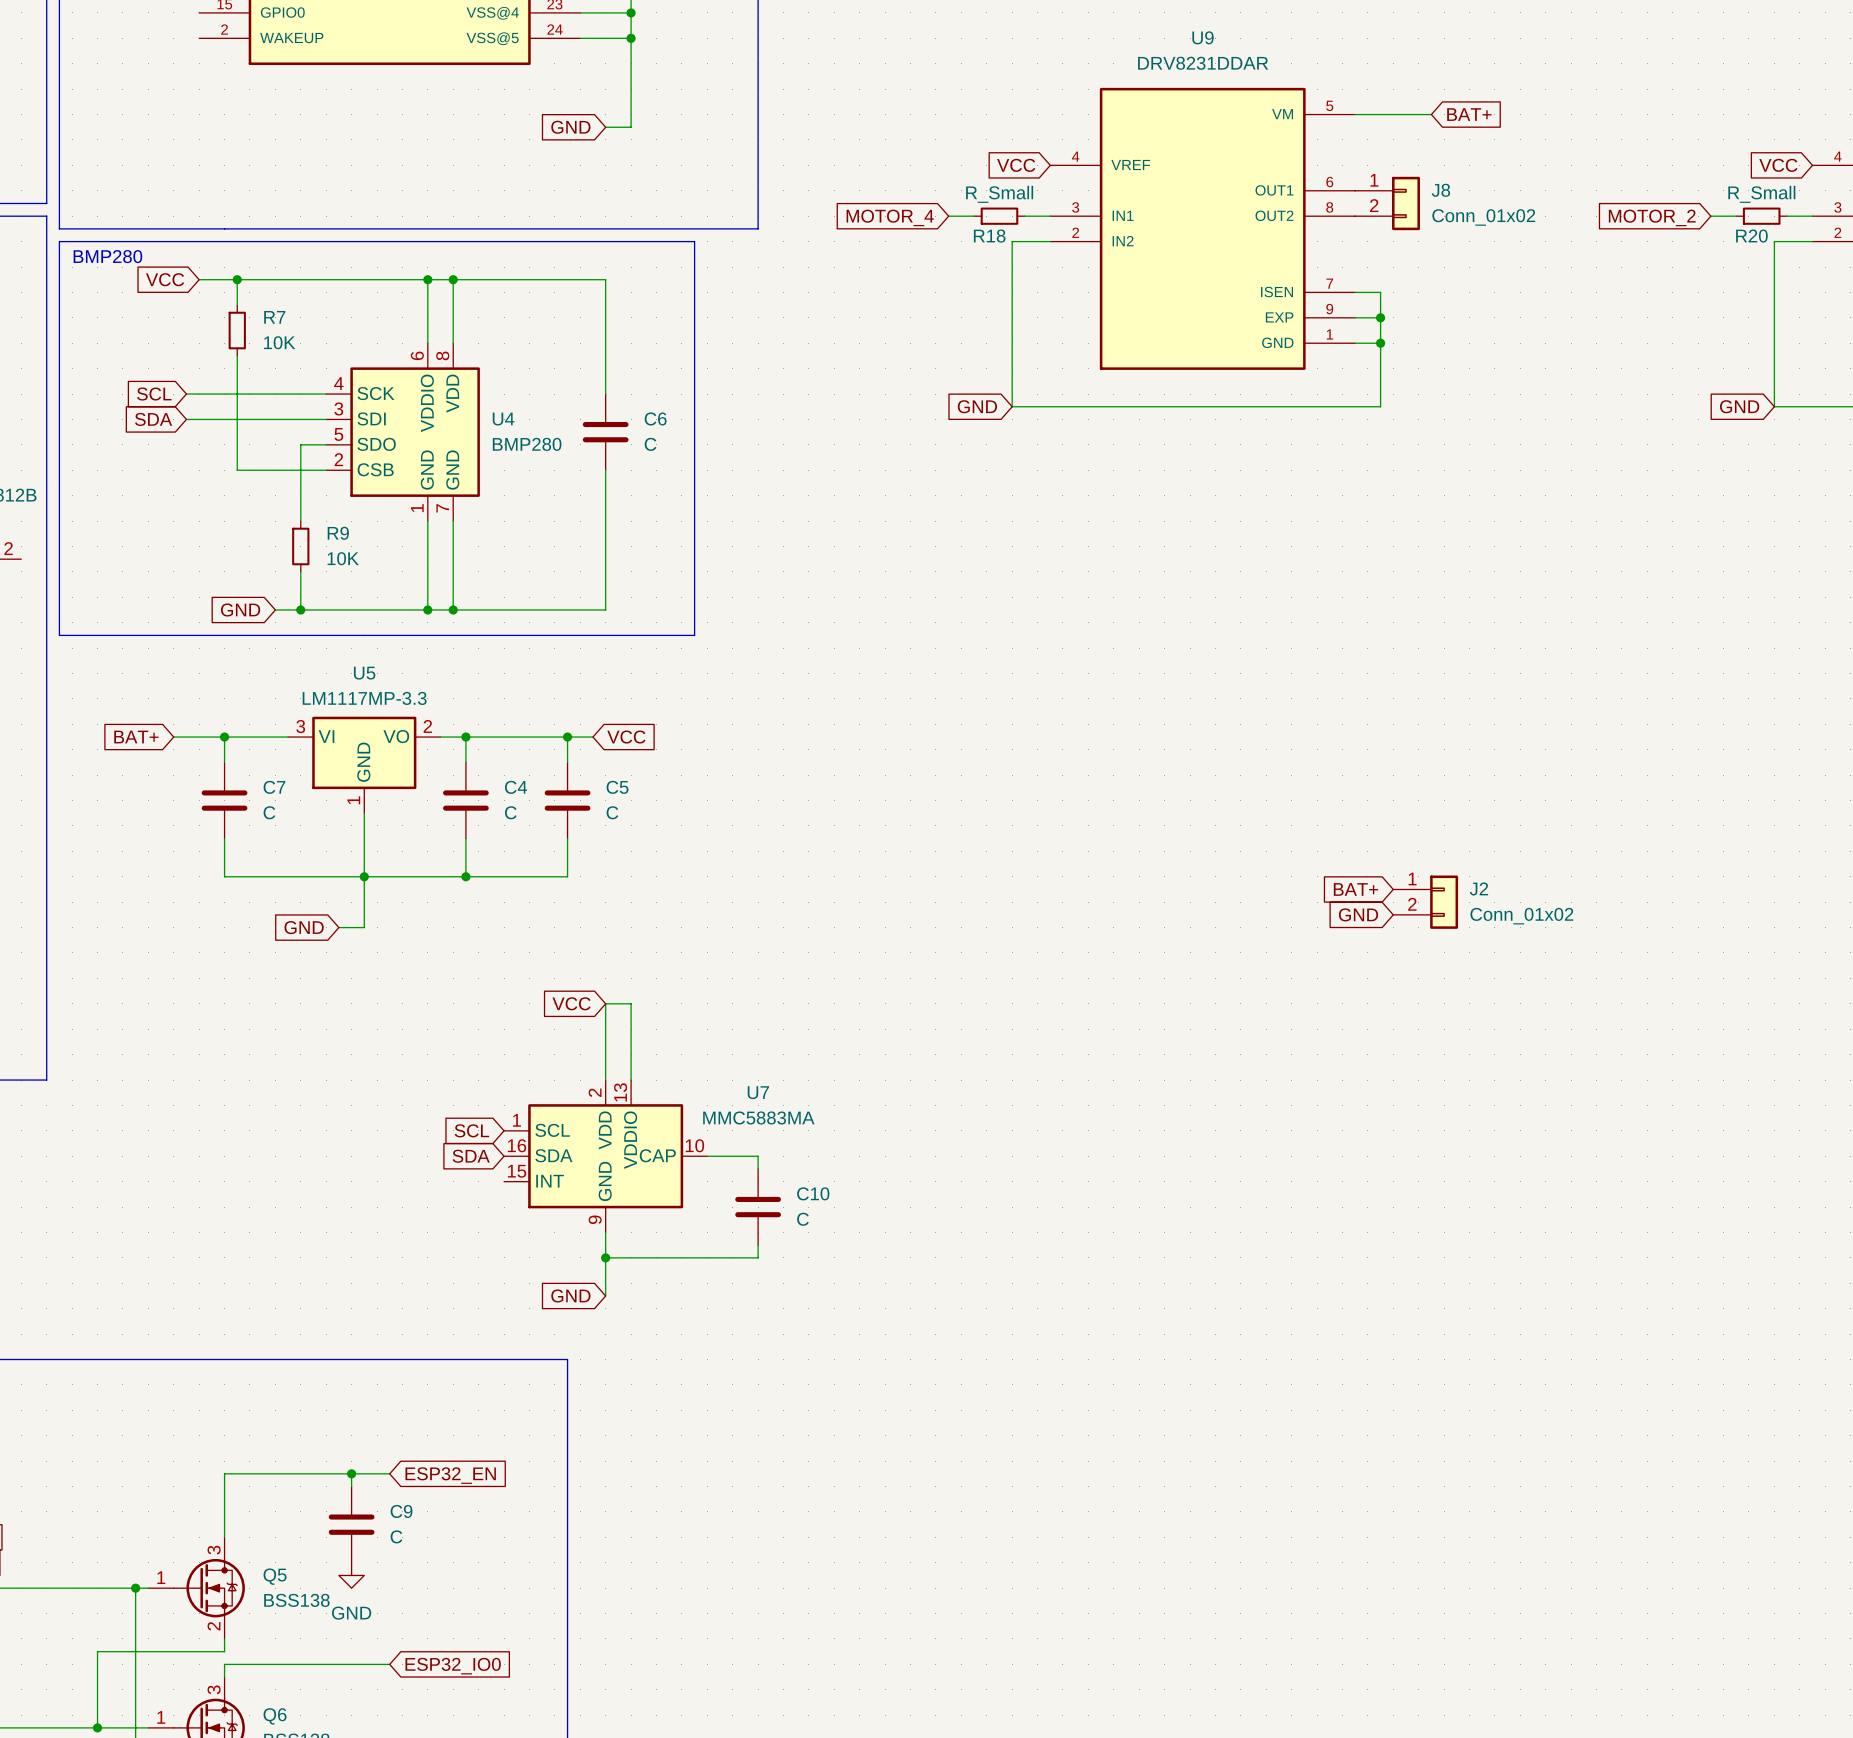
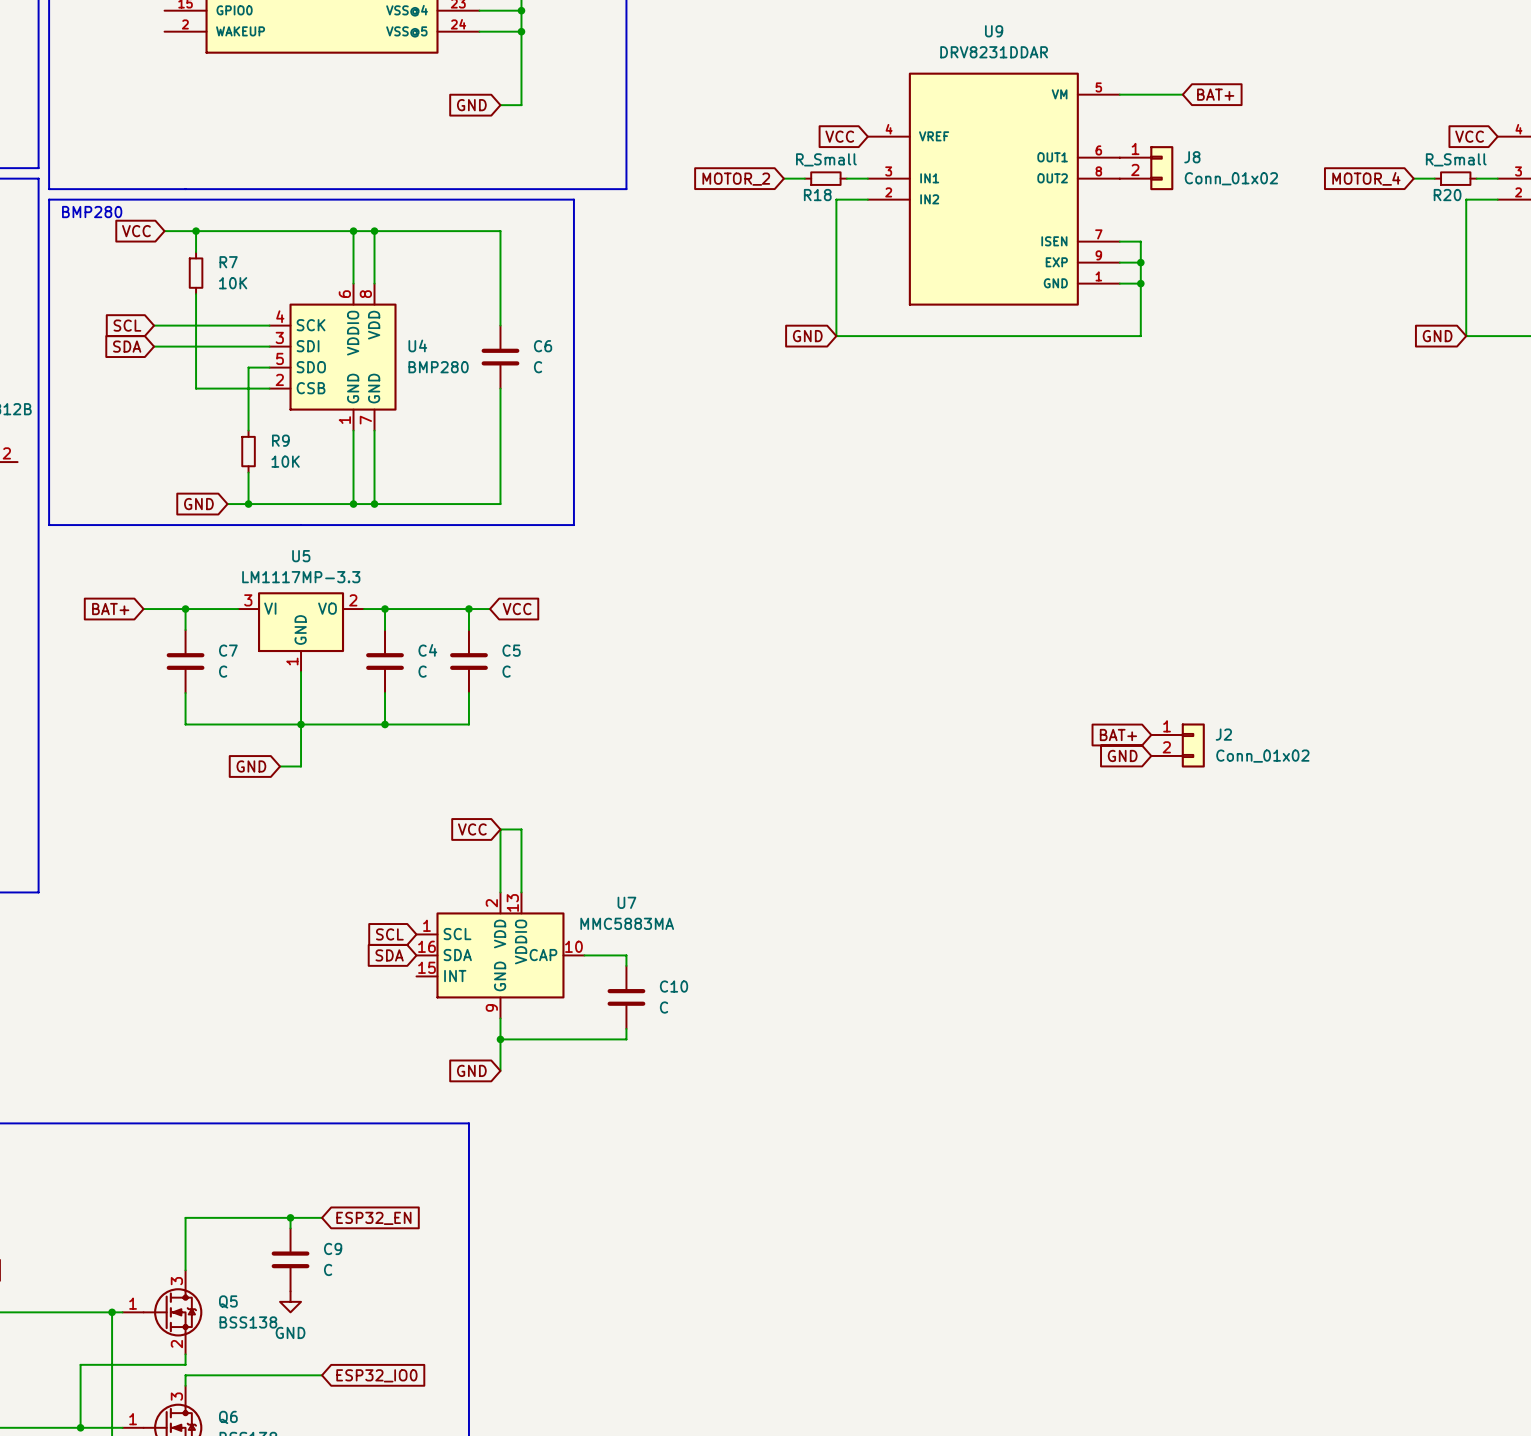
global label: MOTOR_4 (890, 217) -> MOTOR_2 (736, 179)
global label: MOTOR_2 (1652, 217) -> MOTOR_4 (1366, 178)

